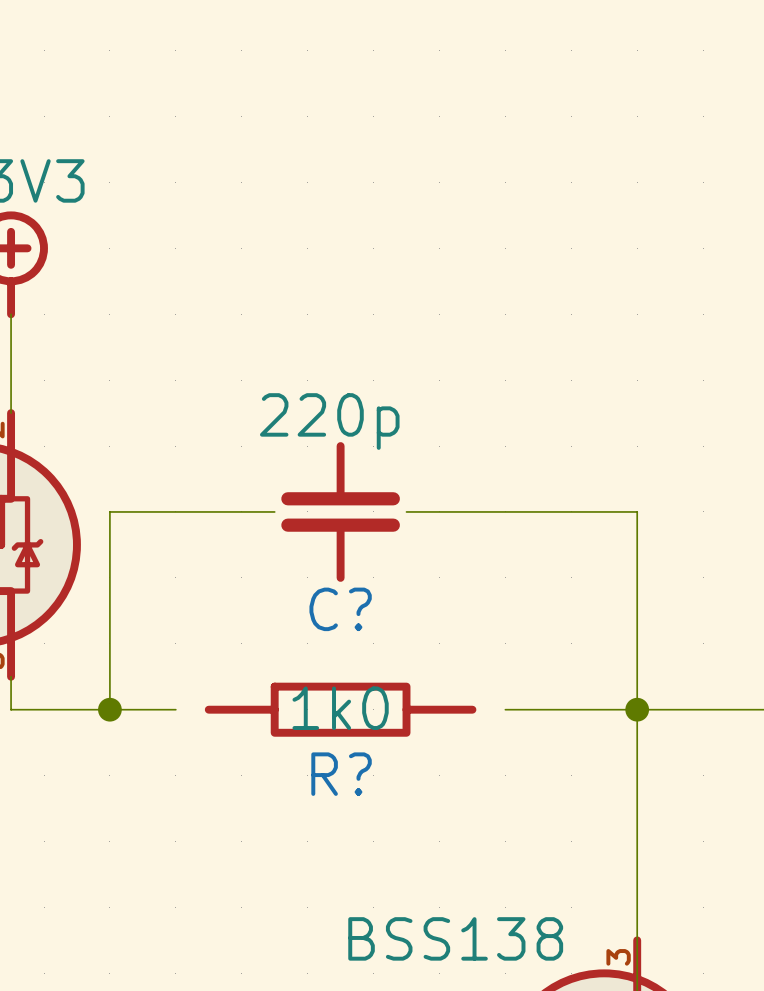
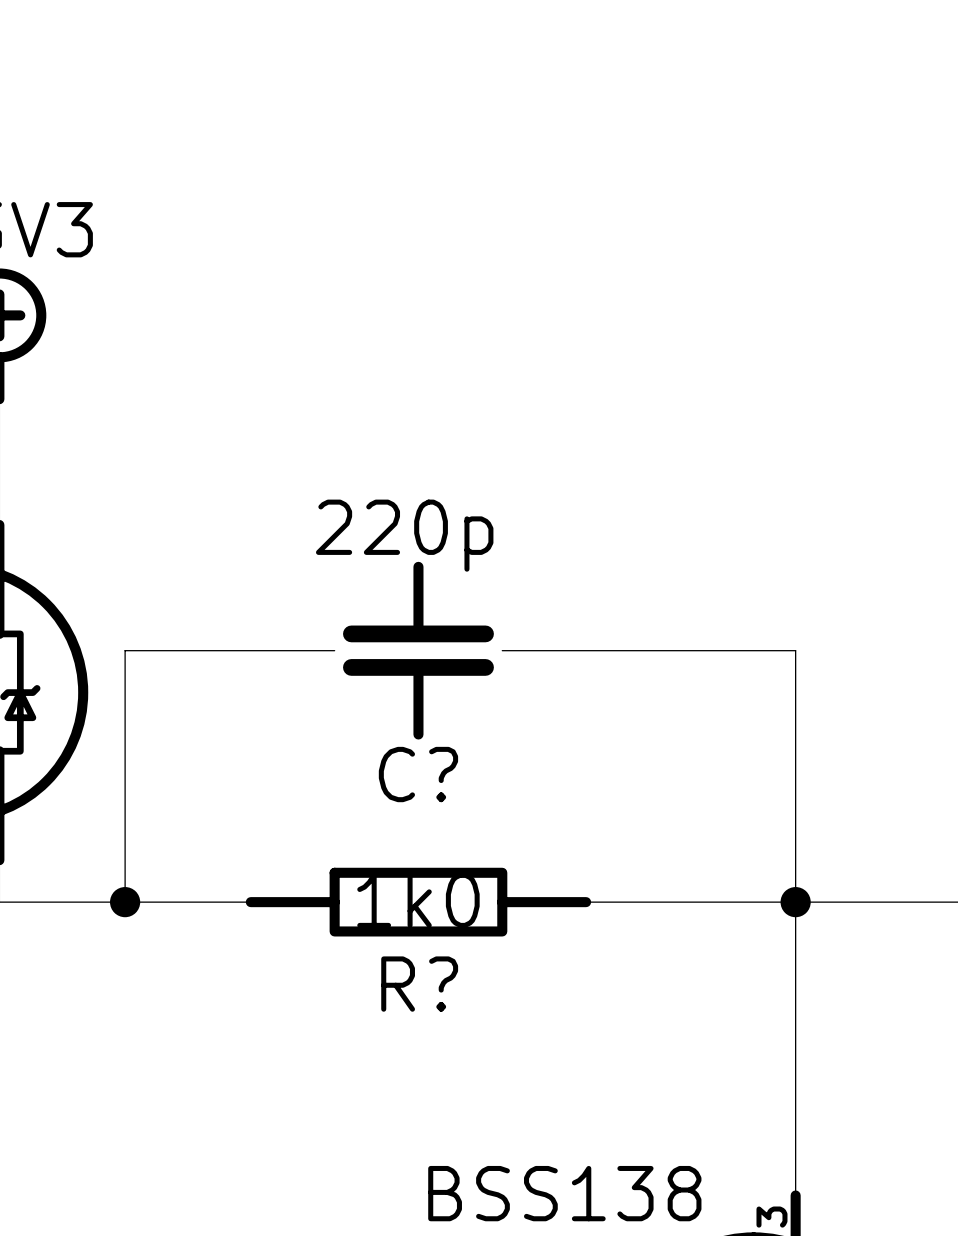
wire: none -> (208, 902) (250, 902)
wire: none -> (586, 902) (628, 902)

